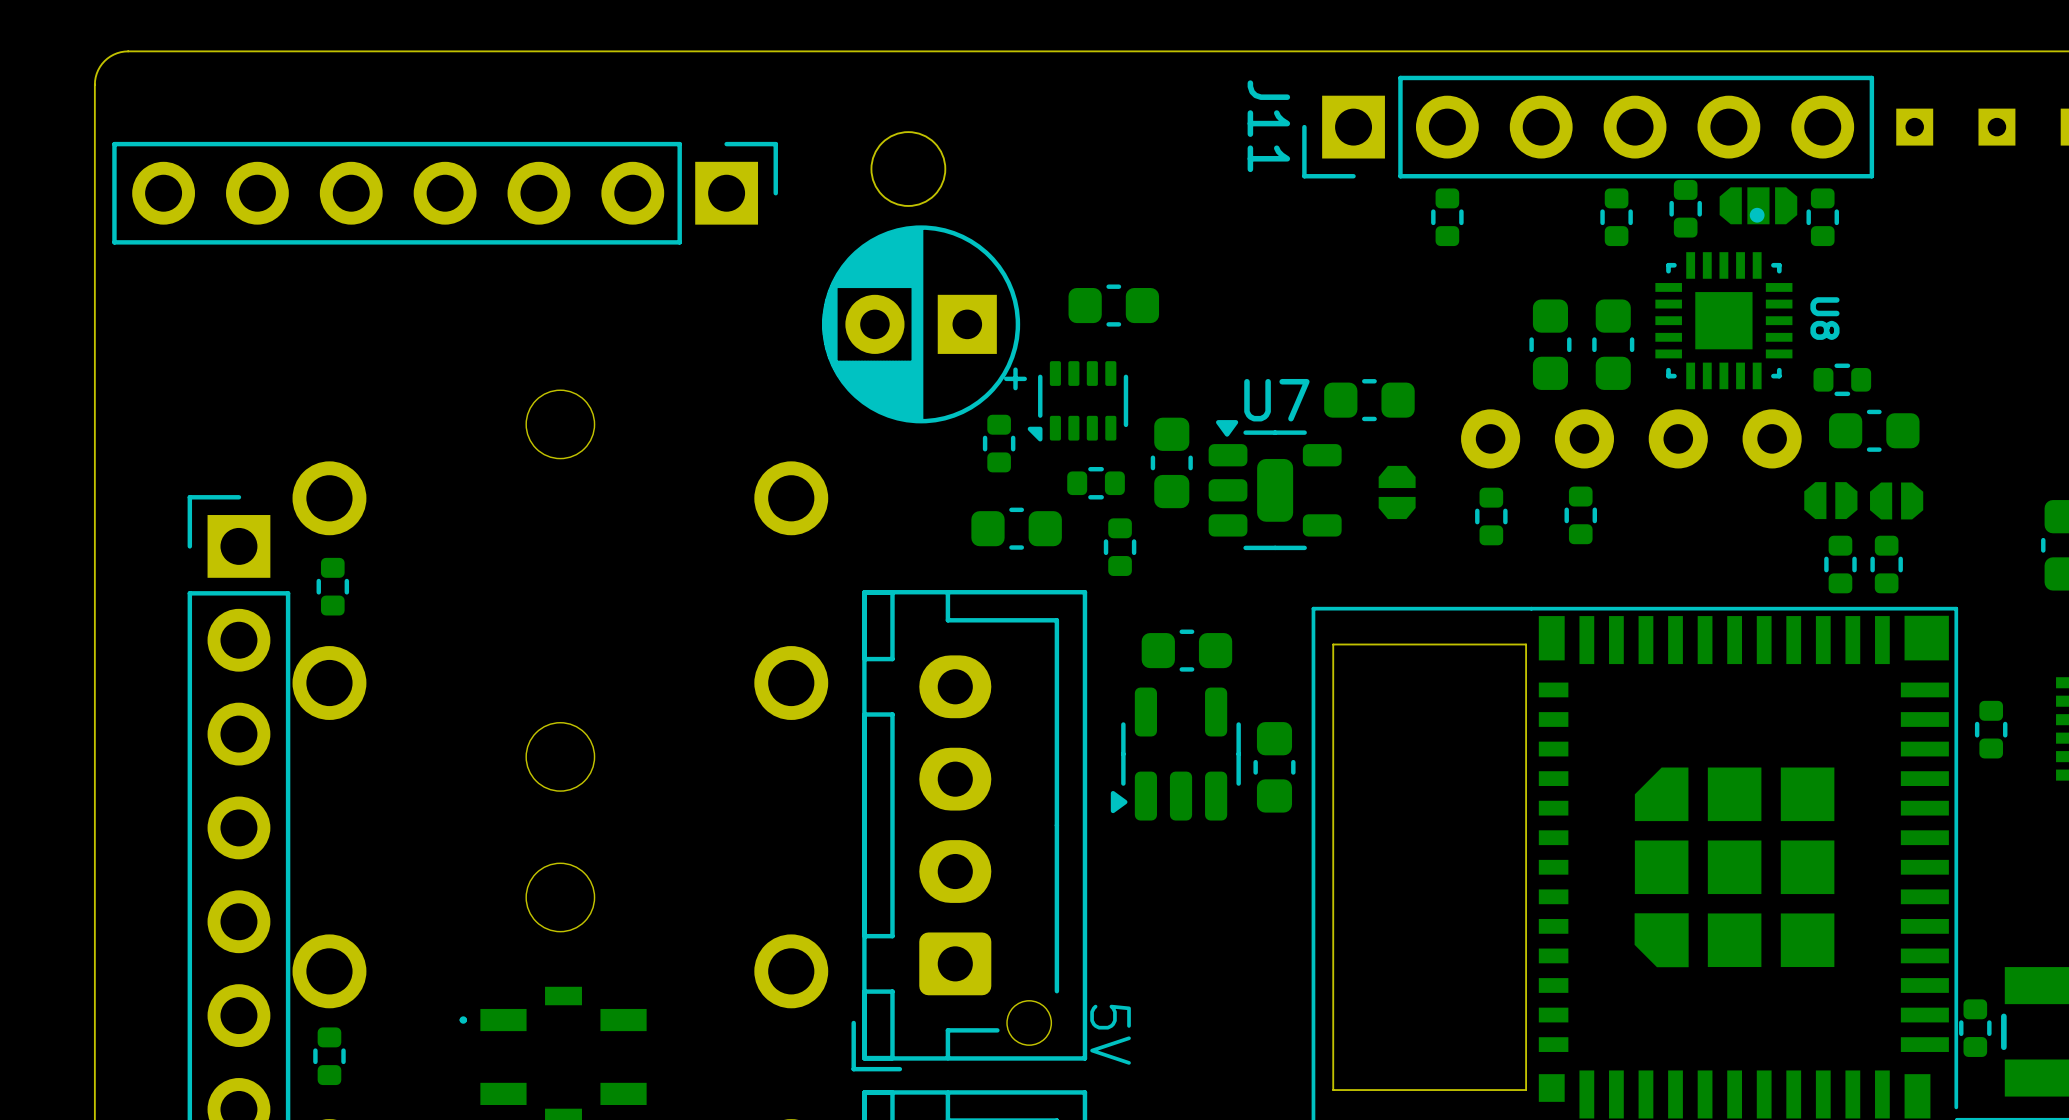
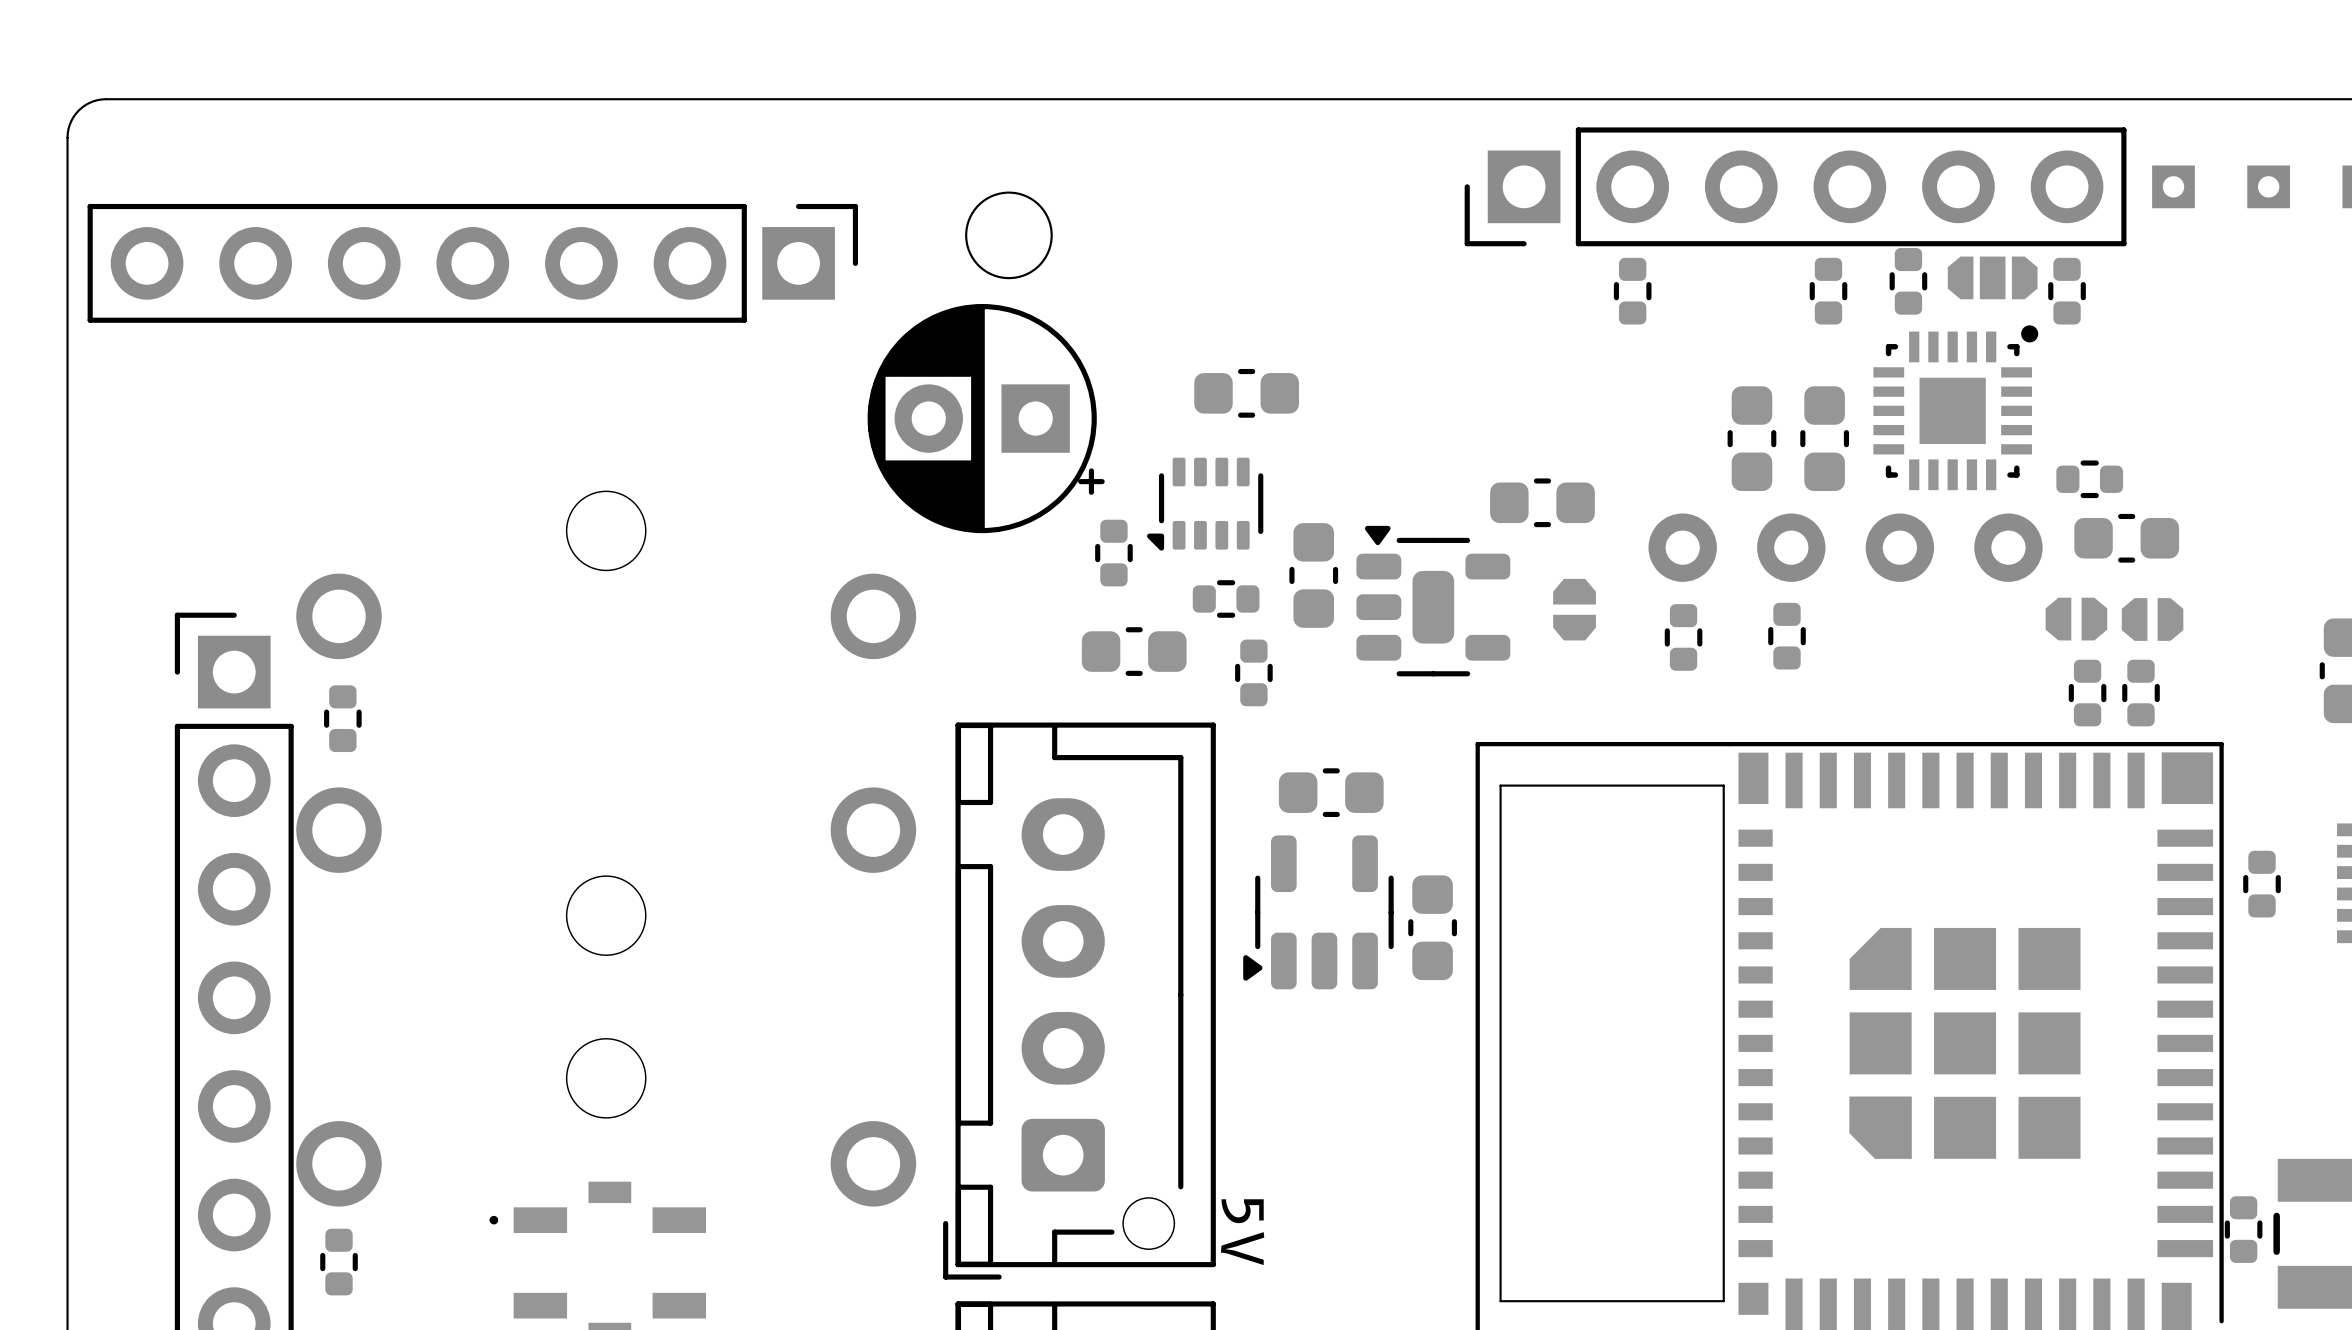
J11 name: J11 (1268, 126) -> none
U8: (1723, 298) -> none
part: none -> (1955, 407)
part position: (924, 324) -> (986, 418)
U7 name: U7 (1276, 400) -> none

